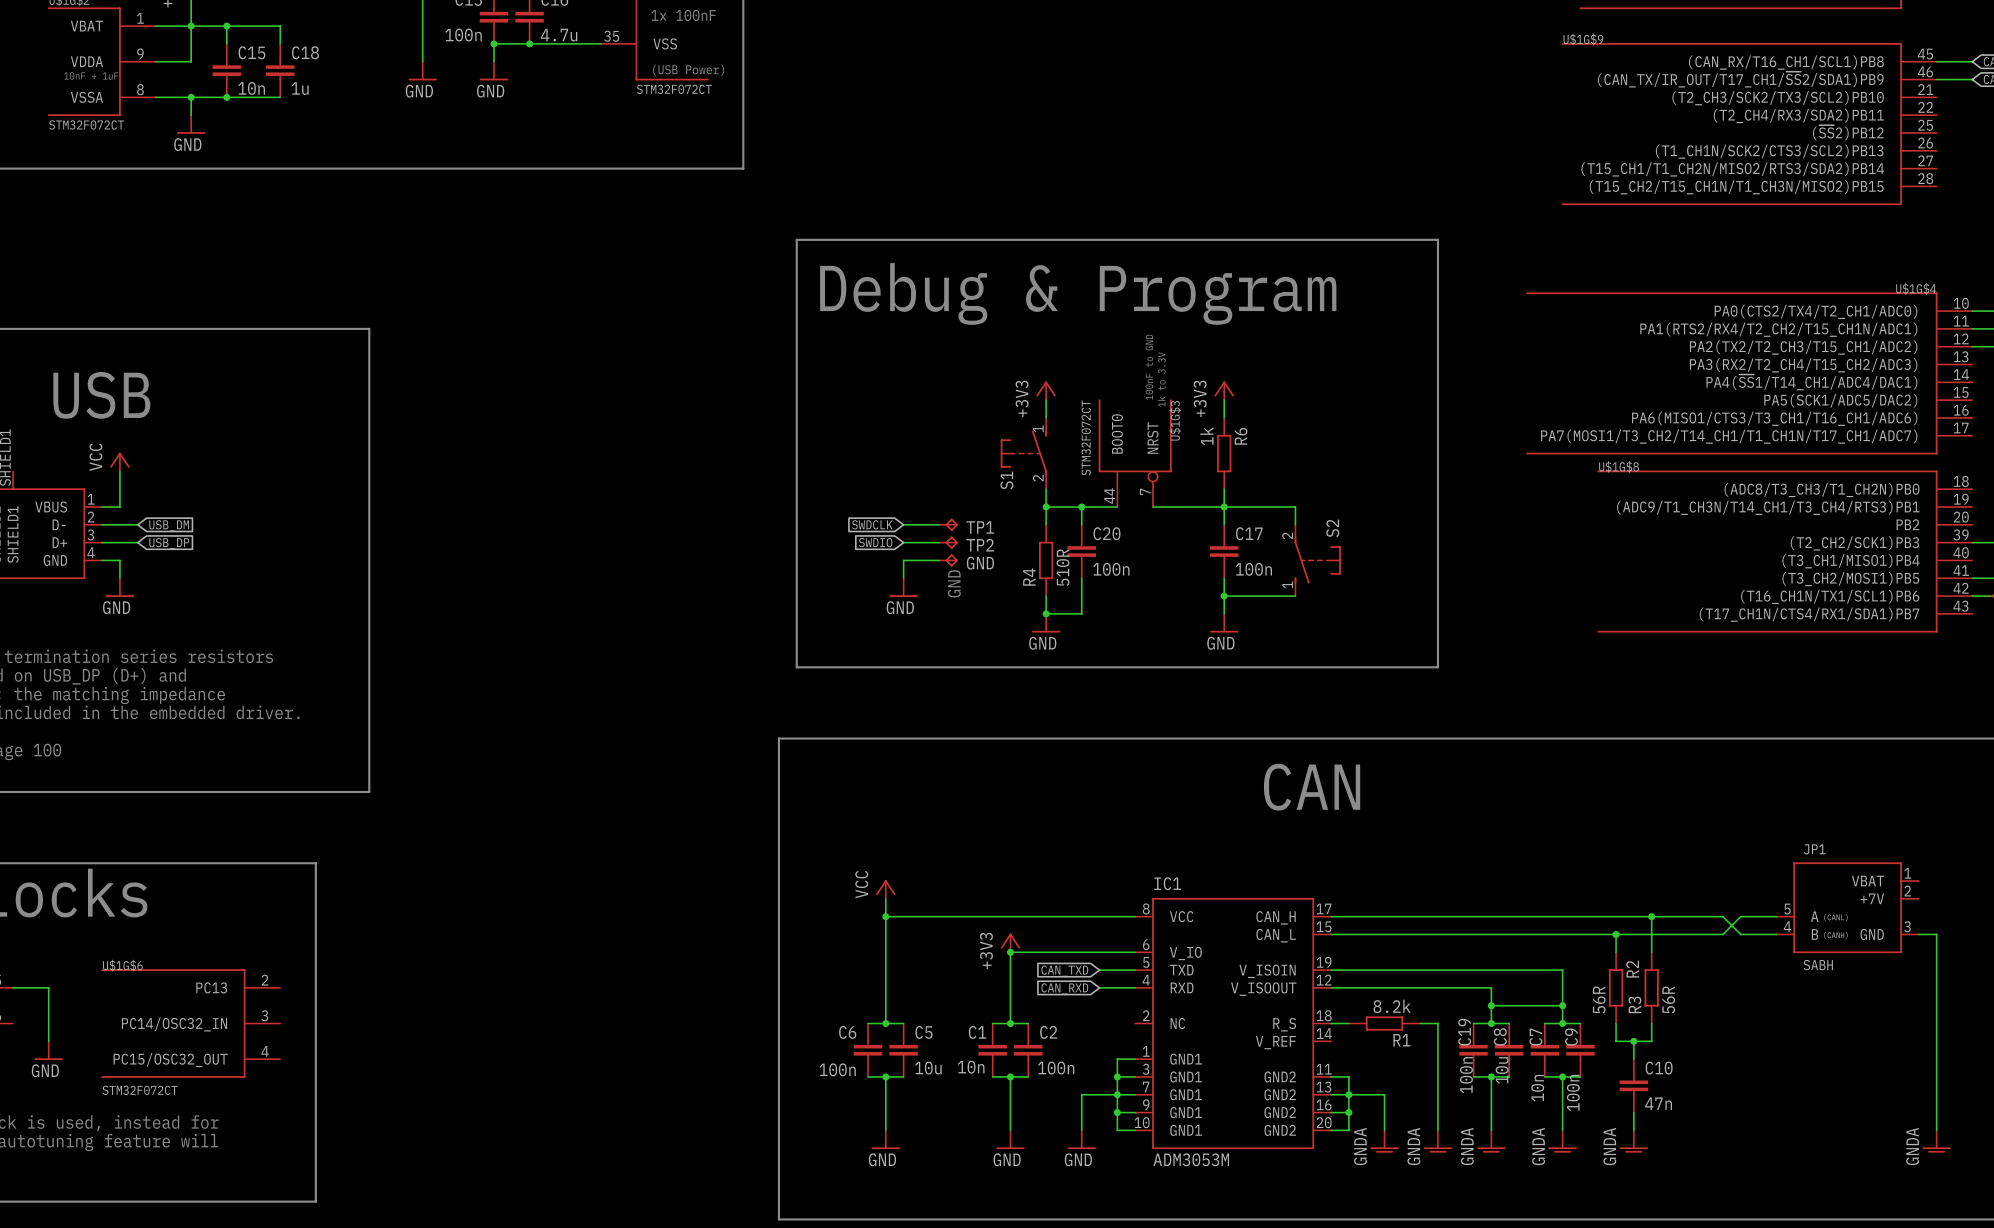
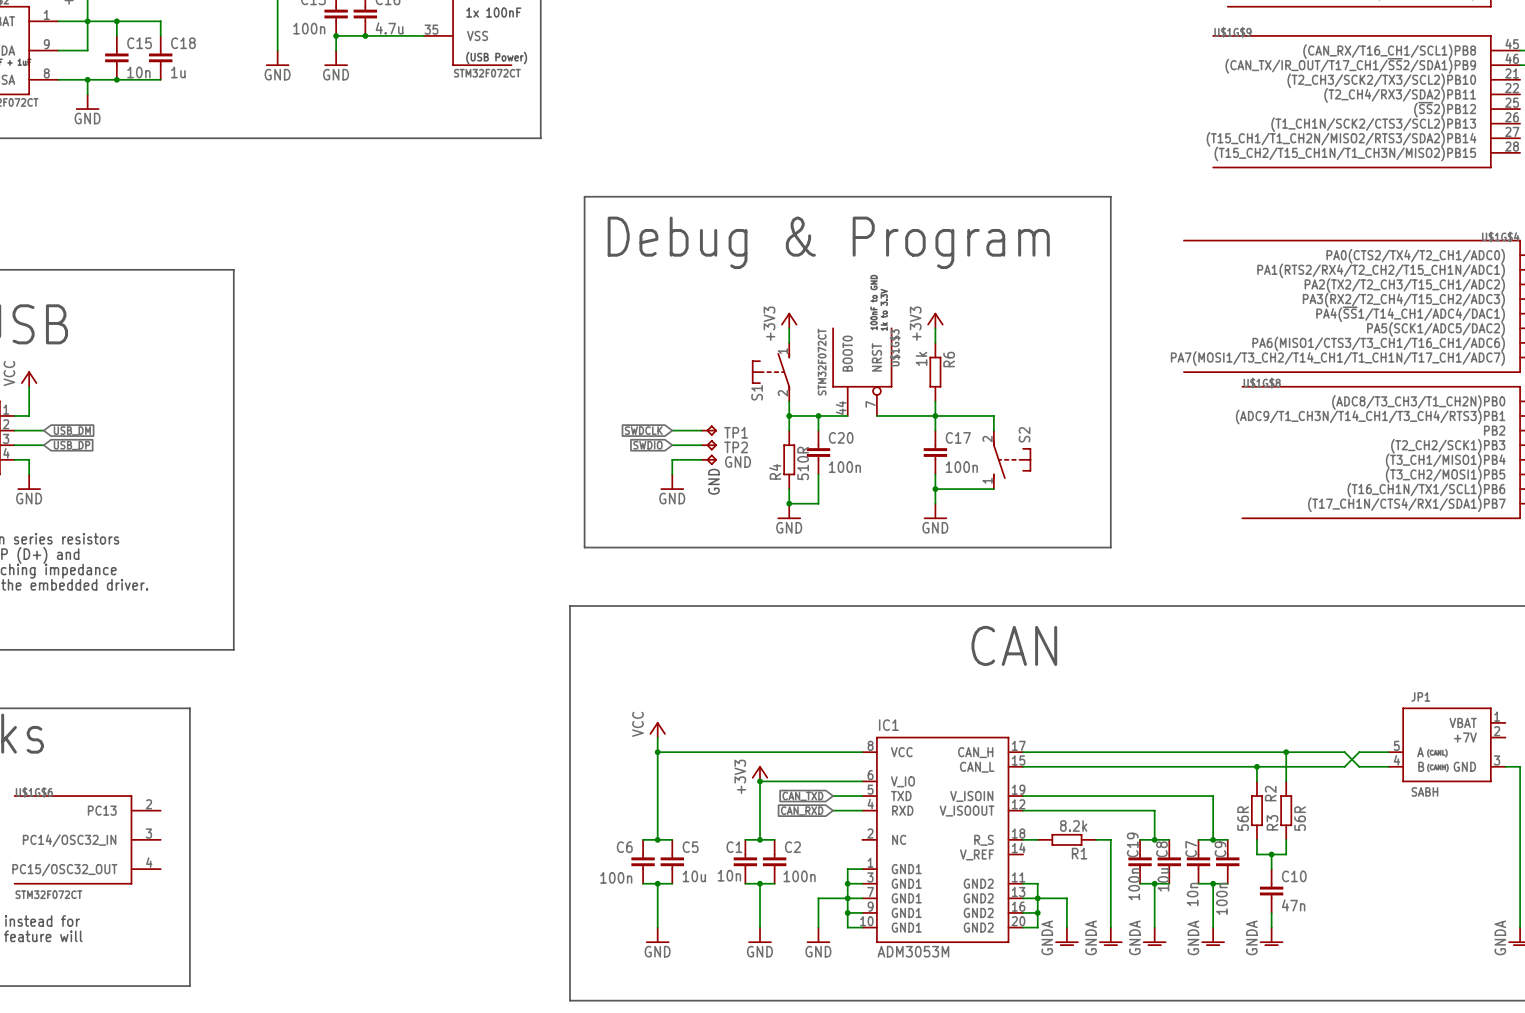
wire: (1491, 1005) (1562, 1005) -> none
junction: (1491, 1005) -> none
junction: (1562, 1005) -> none

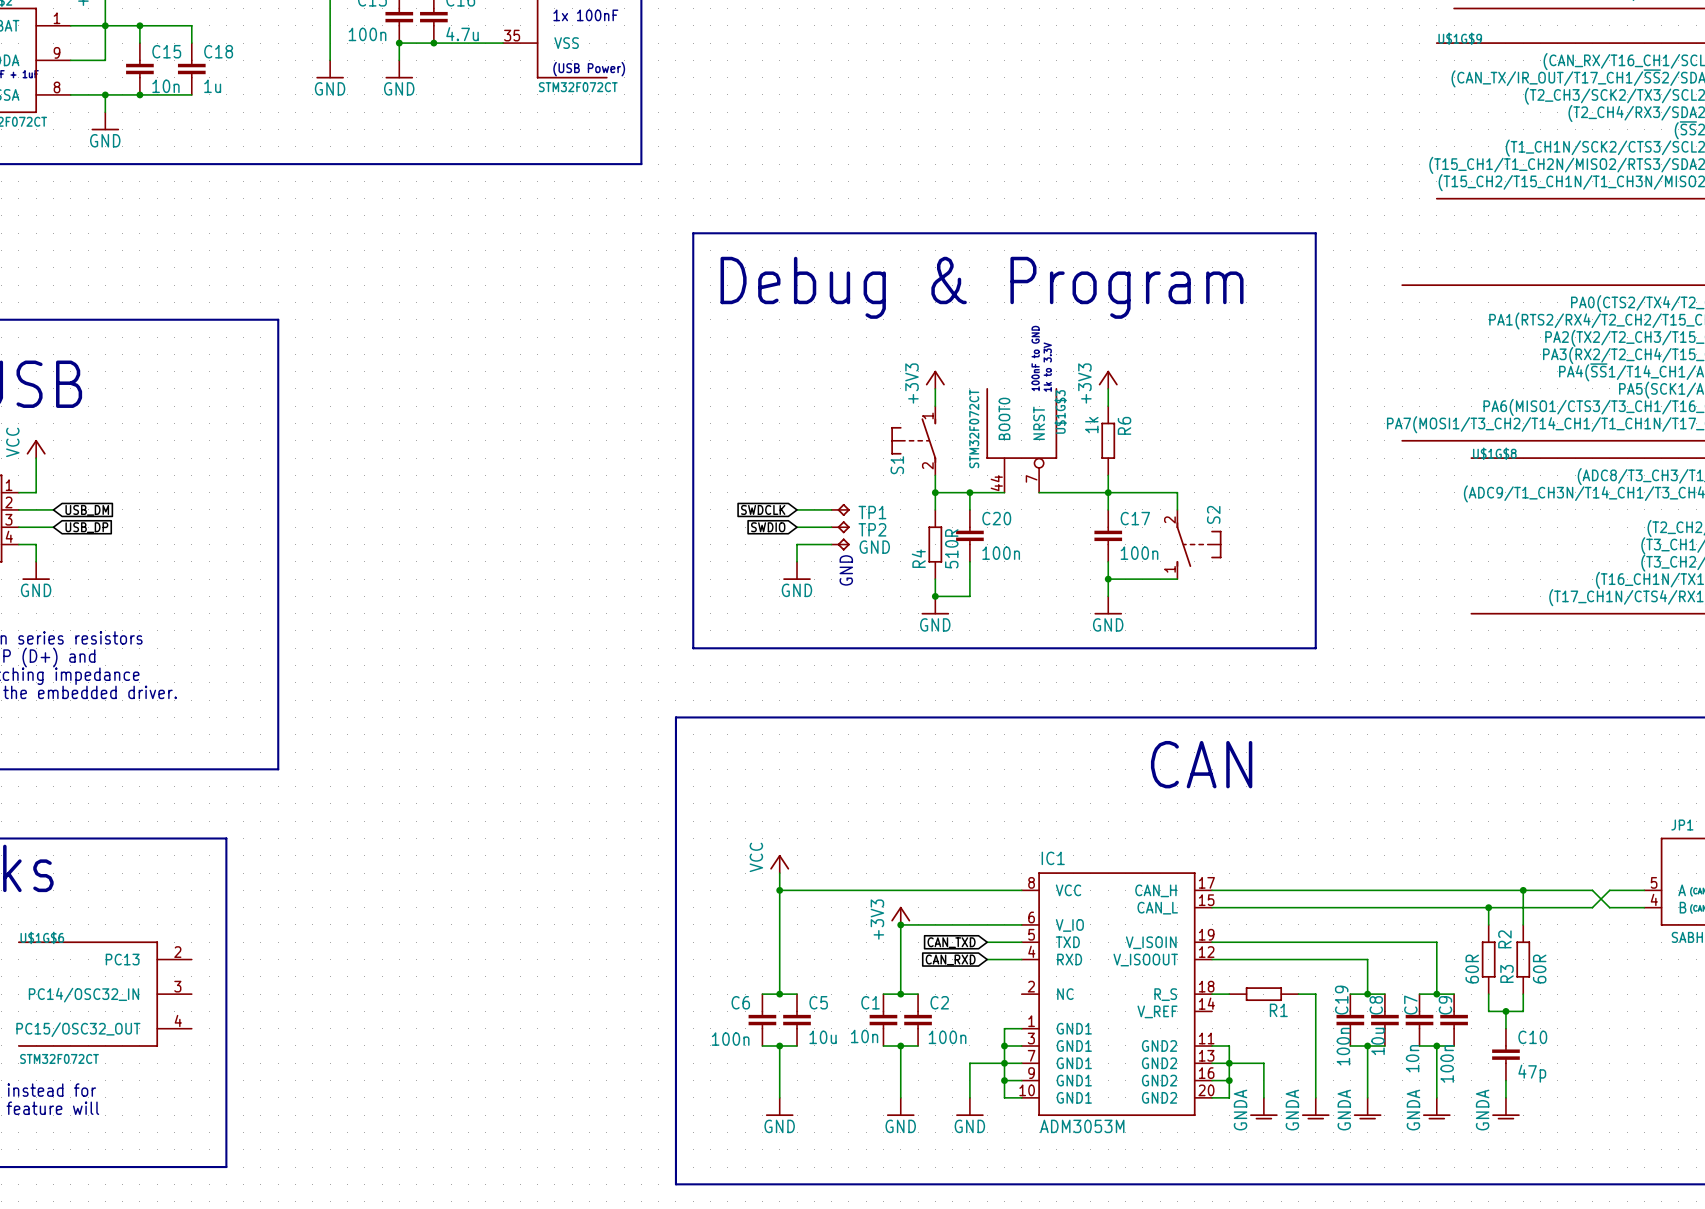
R2 value: 56R (1243, 818) -> 60R (1472, 969)
R3 value: 56R (1300, 818) -> 60R (1539, 969)
R1 value: 8.2k (1073, 825) -> none
C10 value: 47n (1293, 905) -> 47p (1532, 1073)

